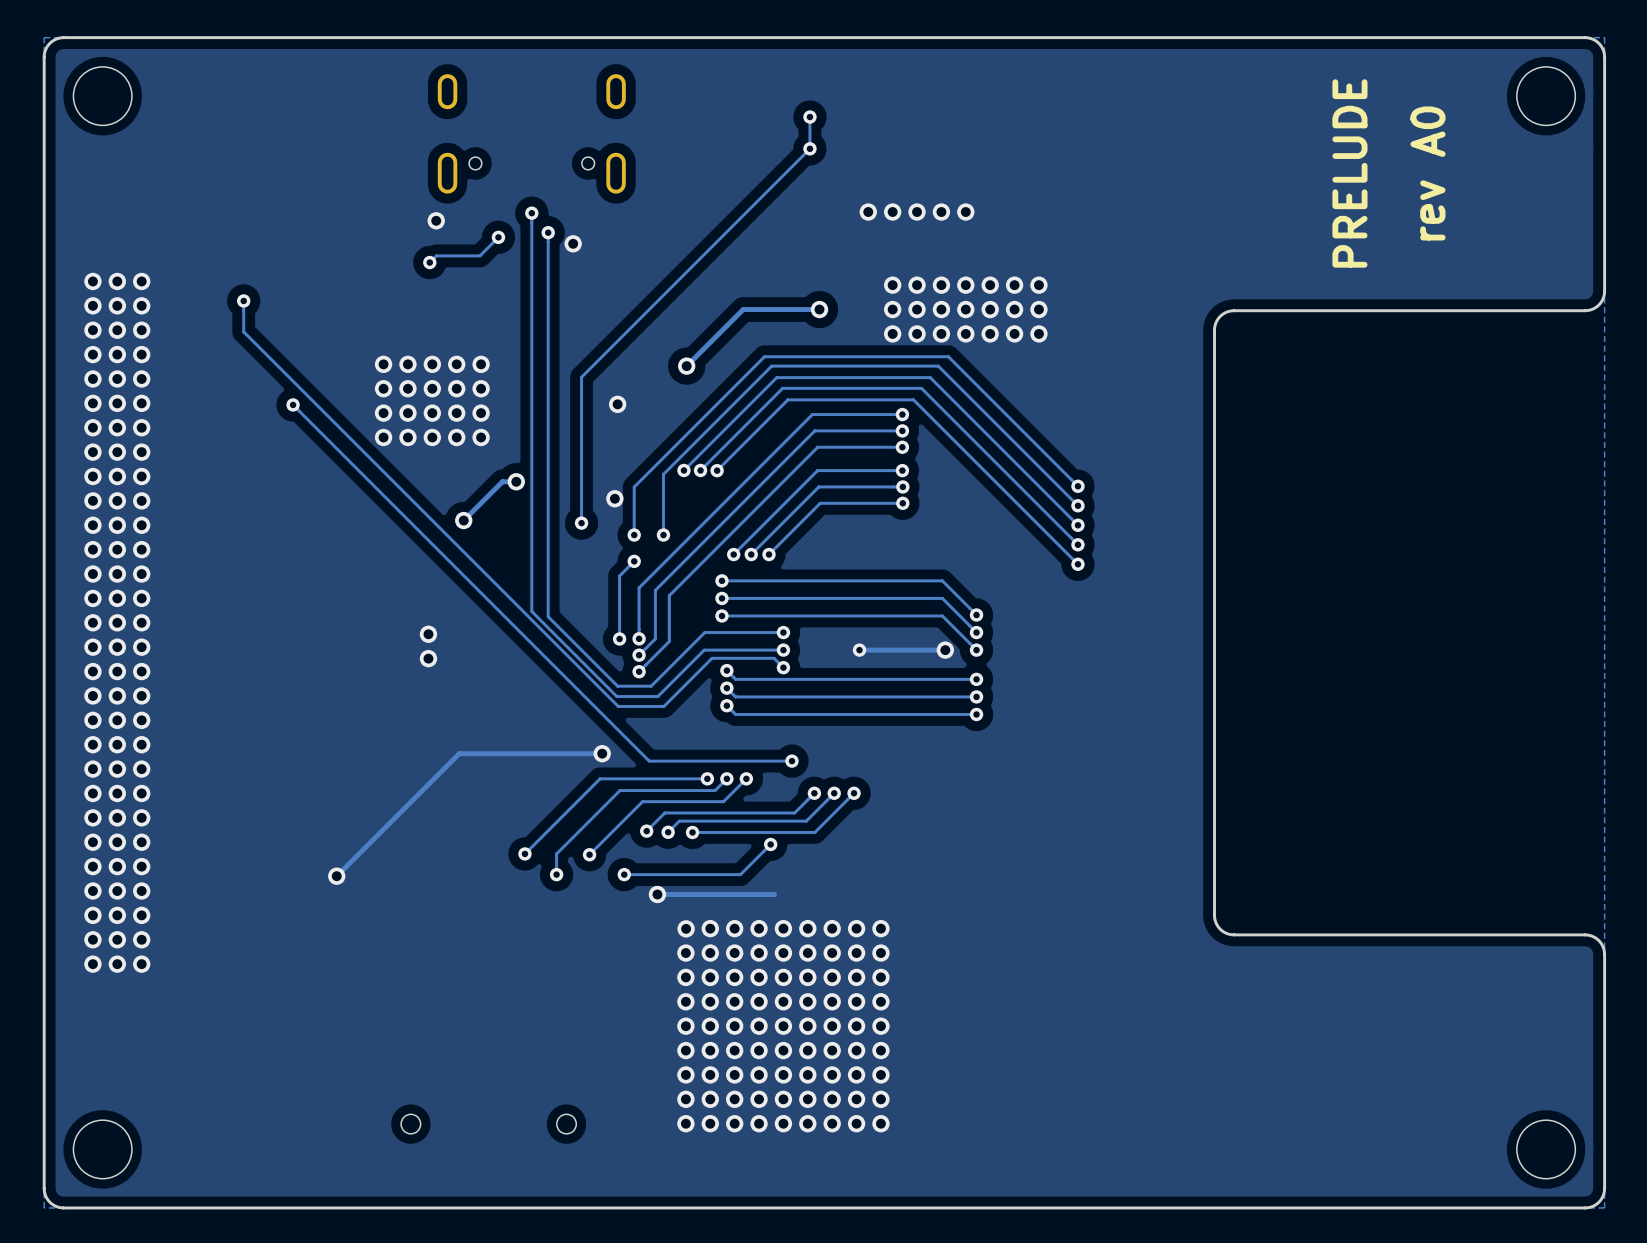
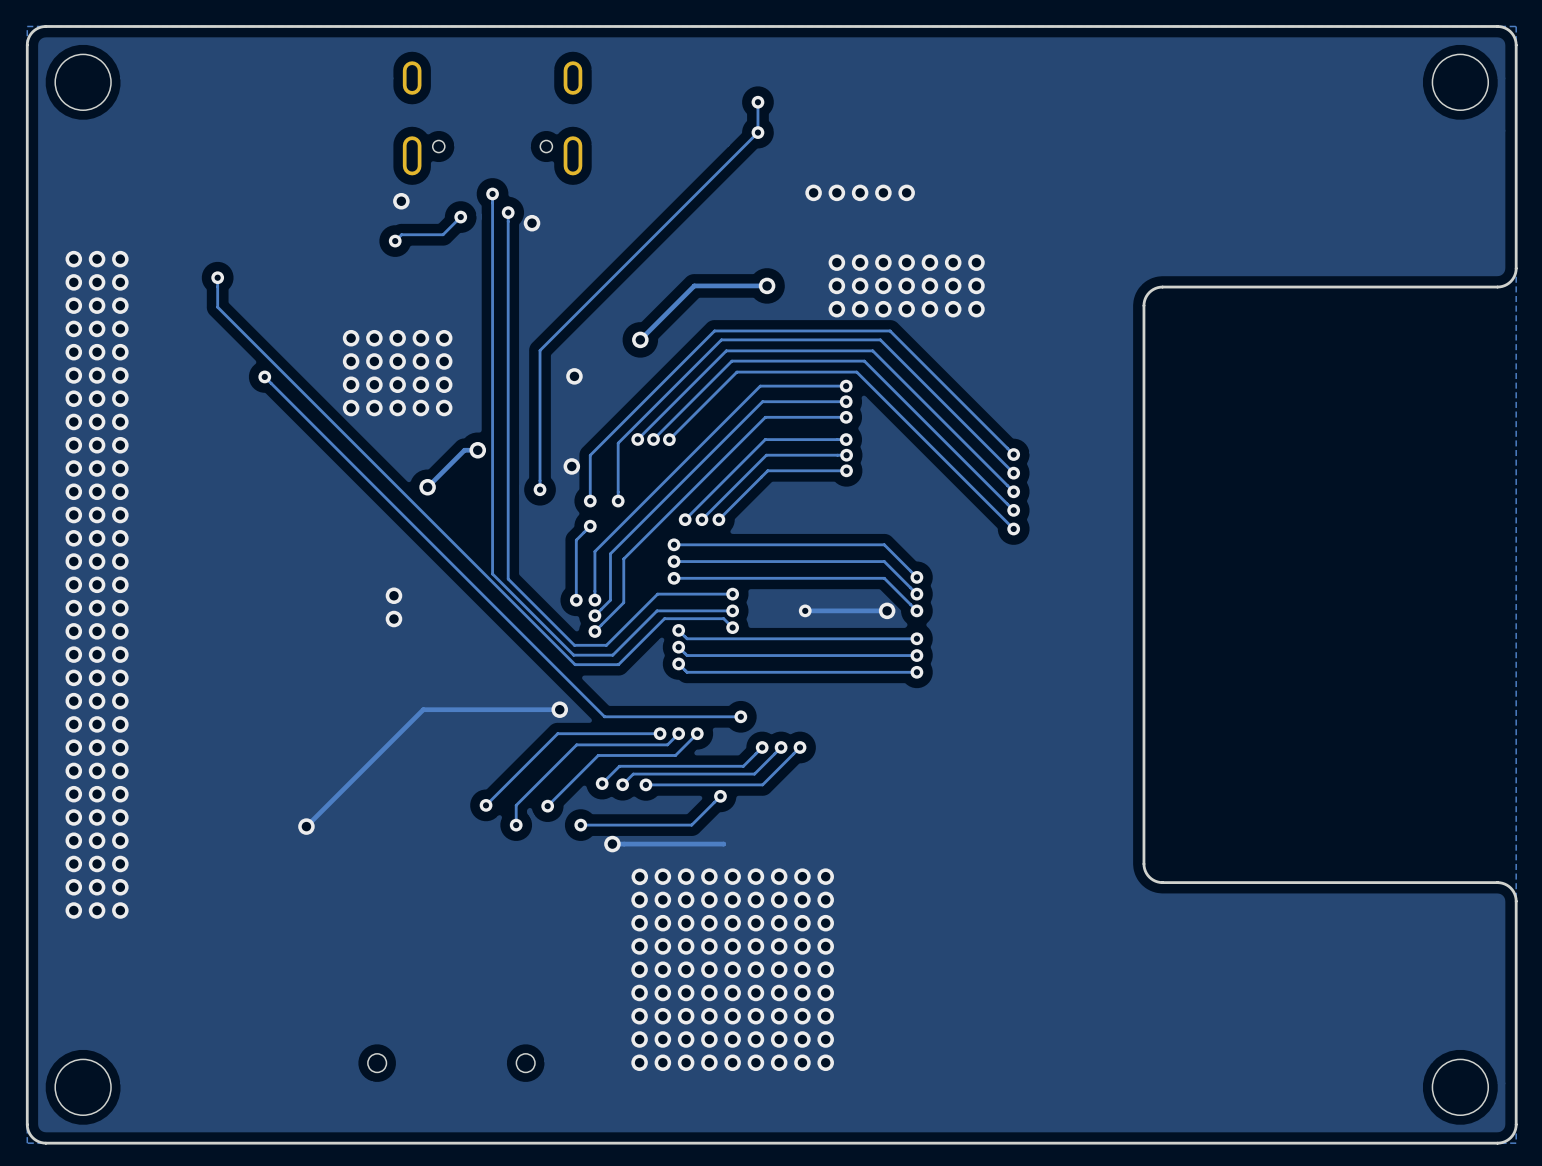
text: PRELUDE (1349, 173) -> none
text: rev A0 (1427, 173) -> none

